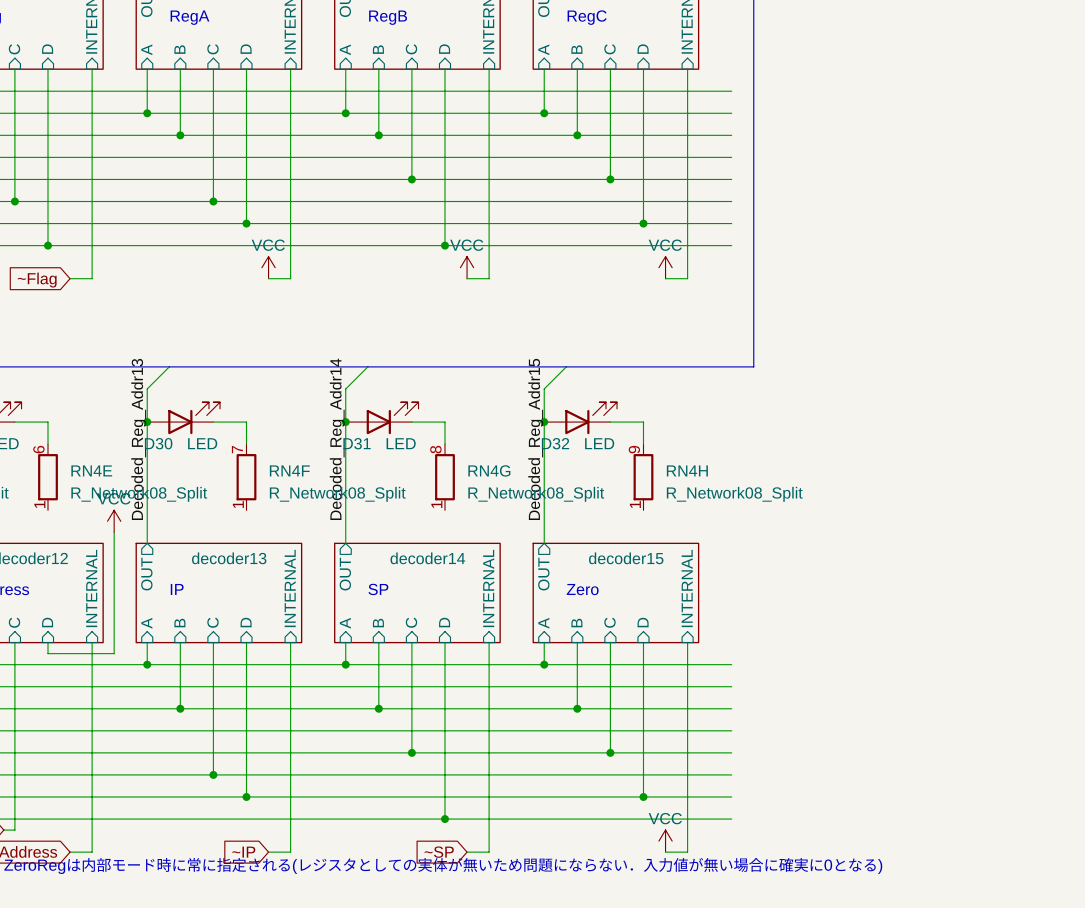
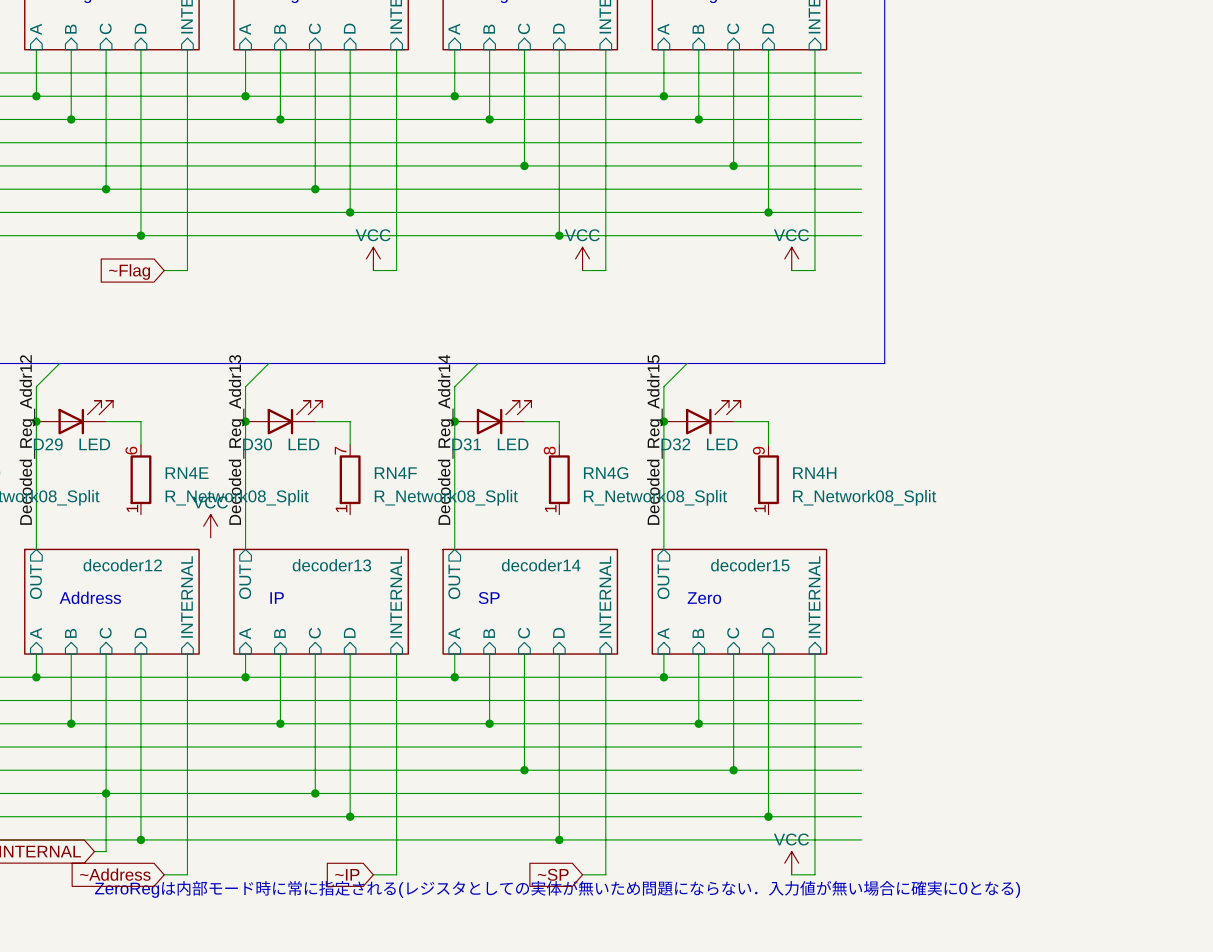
wire: (114, 532) (114, 653) (48, 653) -> (140, 839) (140, 665)
junction: none -> (106, 793)
junction: none -> (140, 839)

